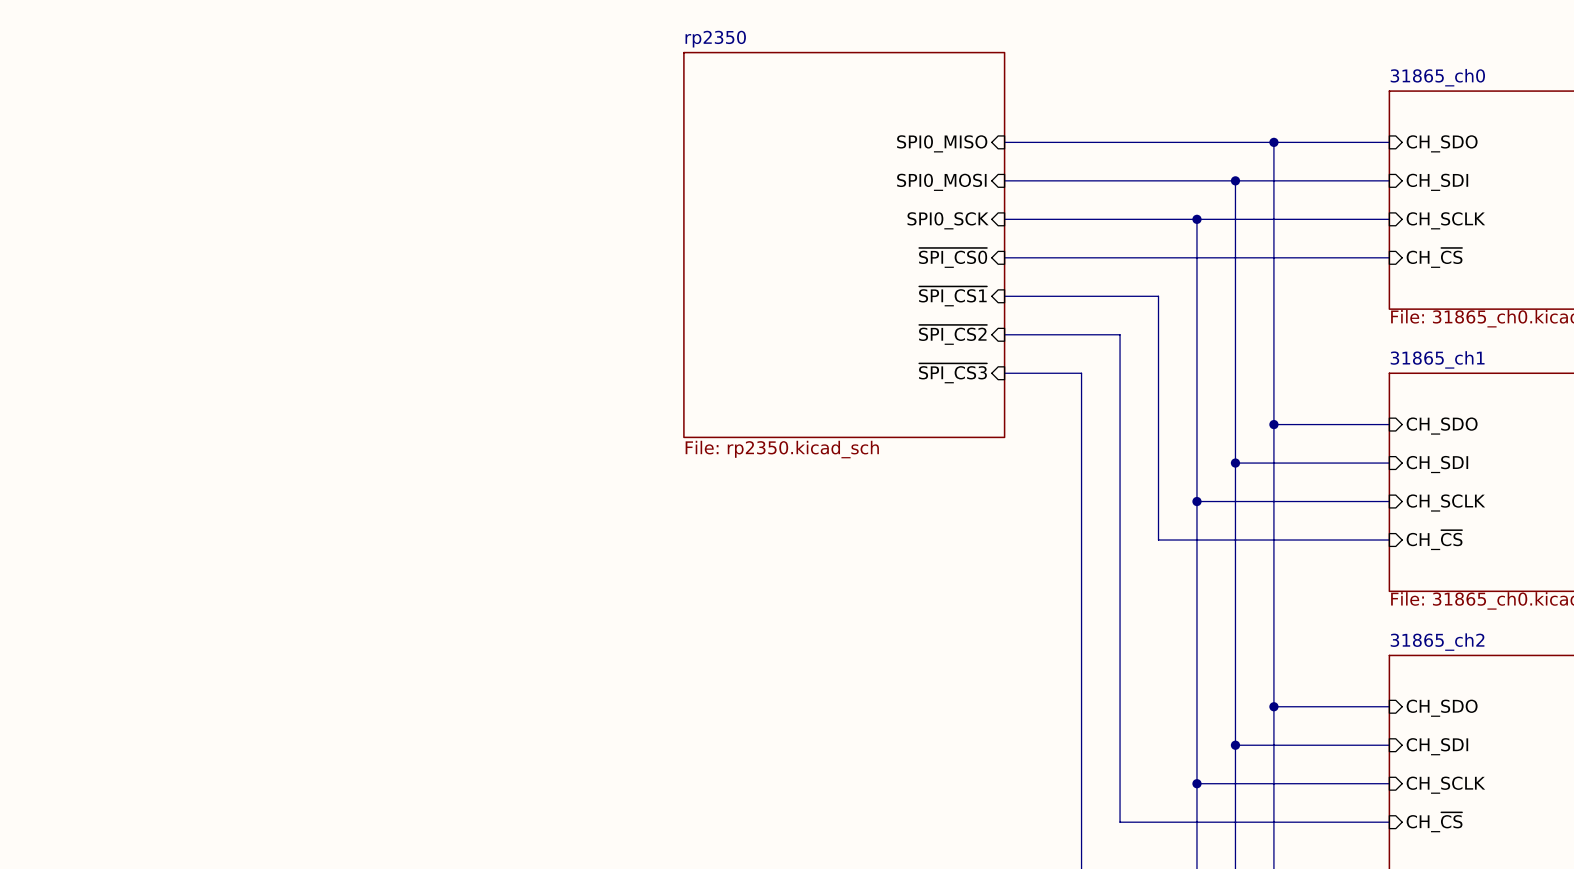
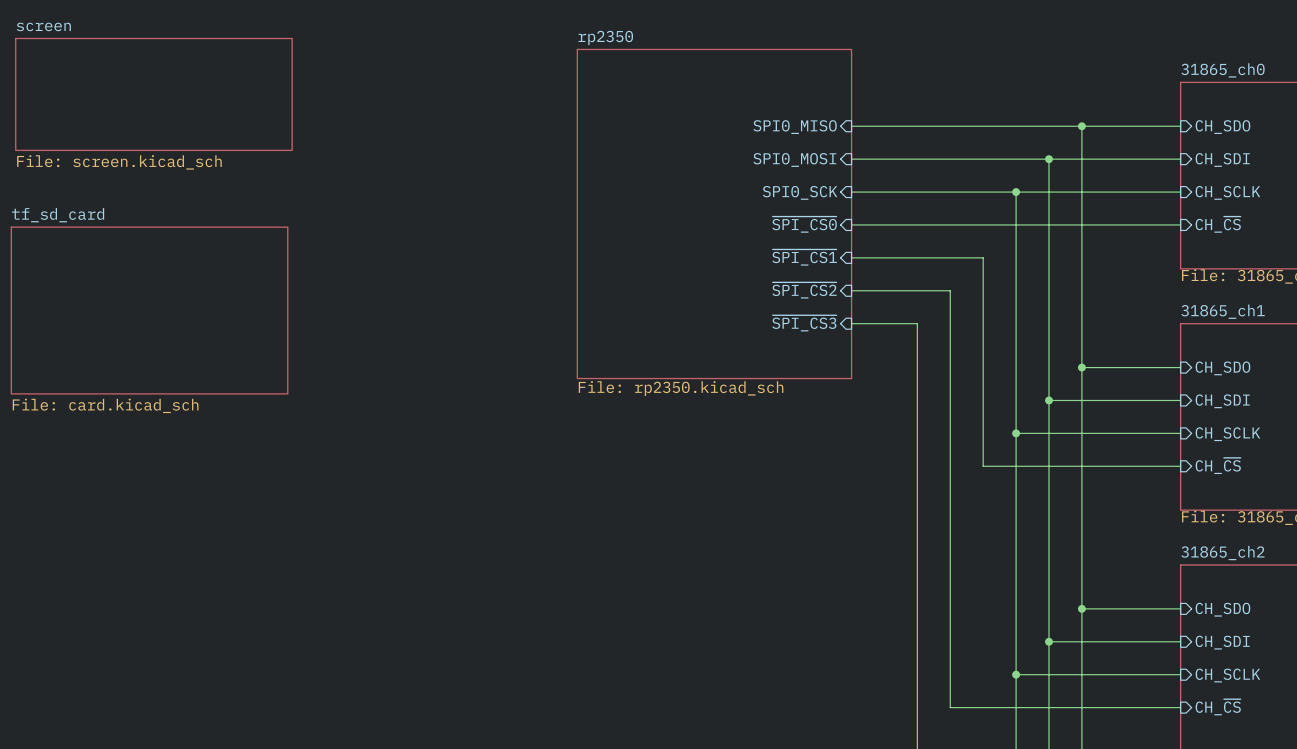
sheet screen: none -> File: screen.kicad_sch (153, 94)
sheet tf_sd_card: none -> File: card.kicad_sch (149, 310)

